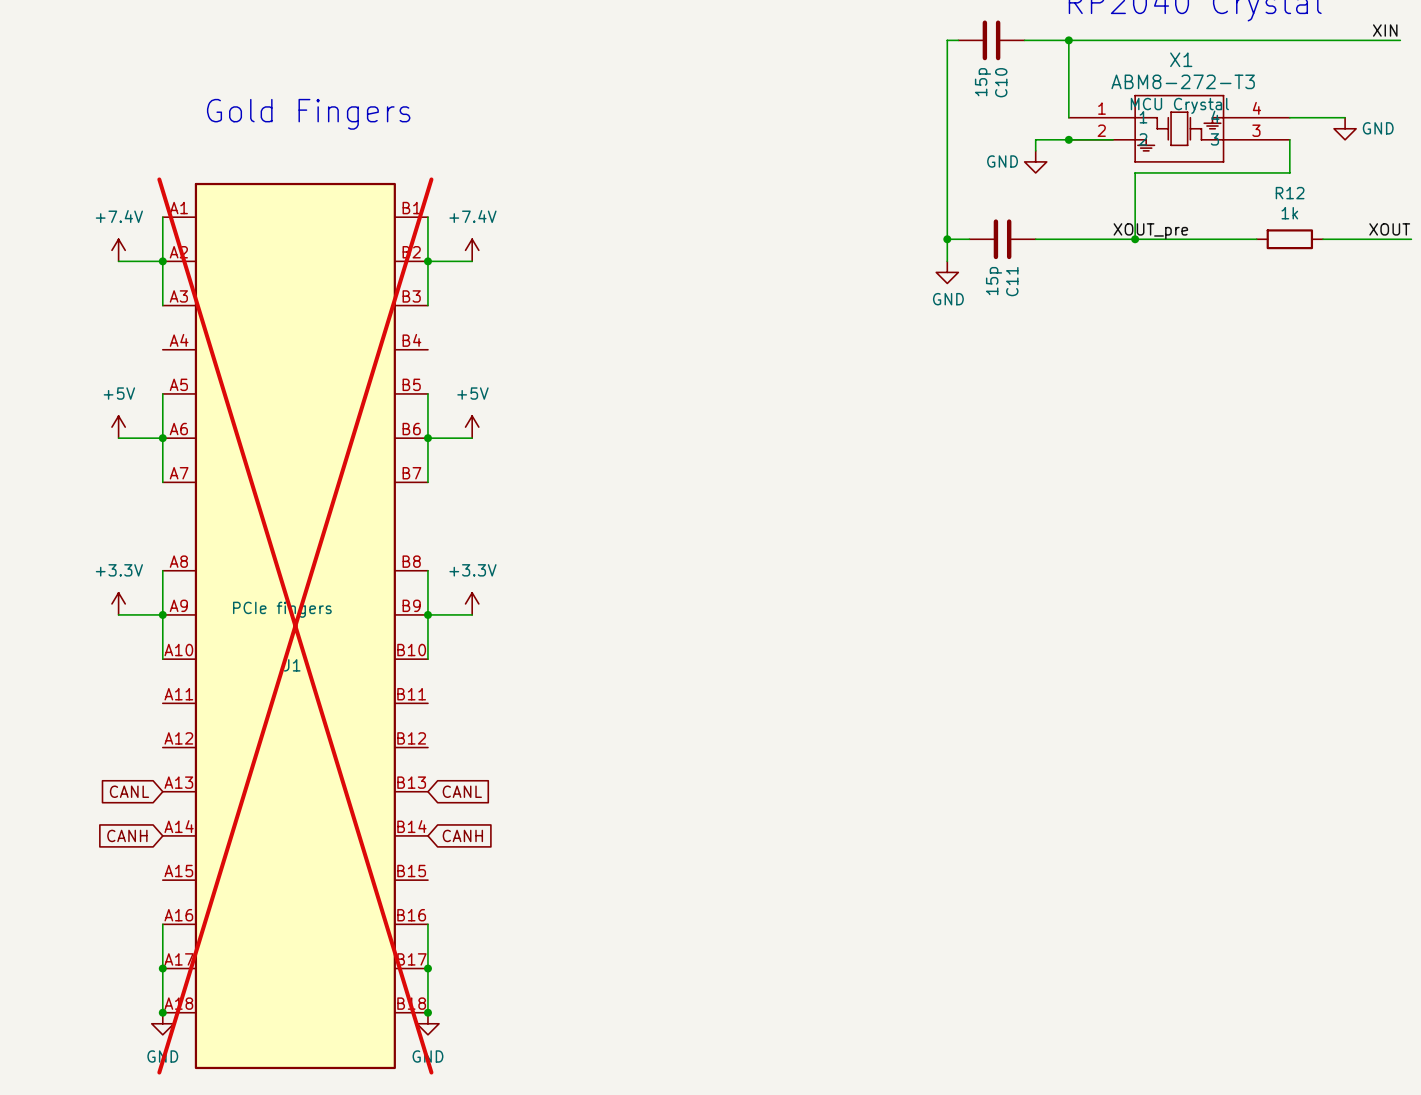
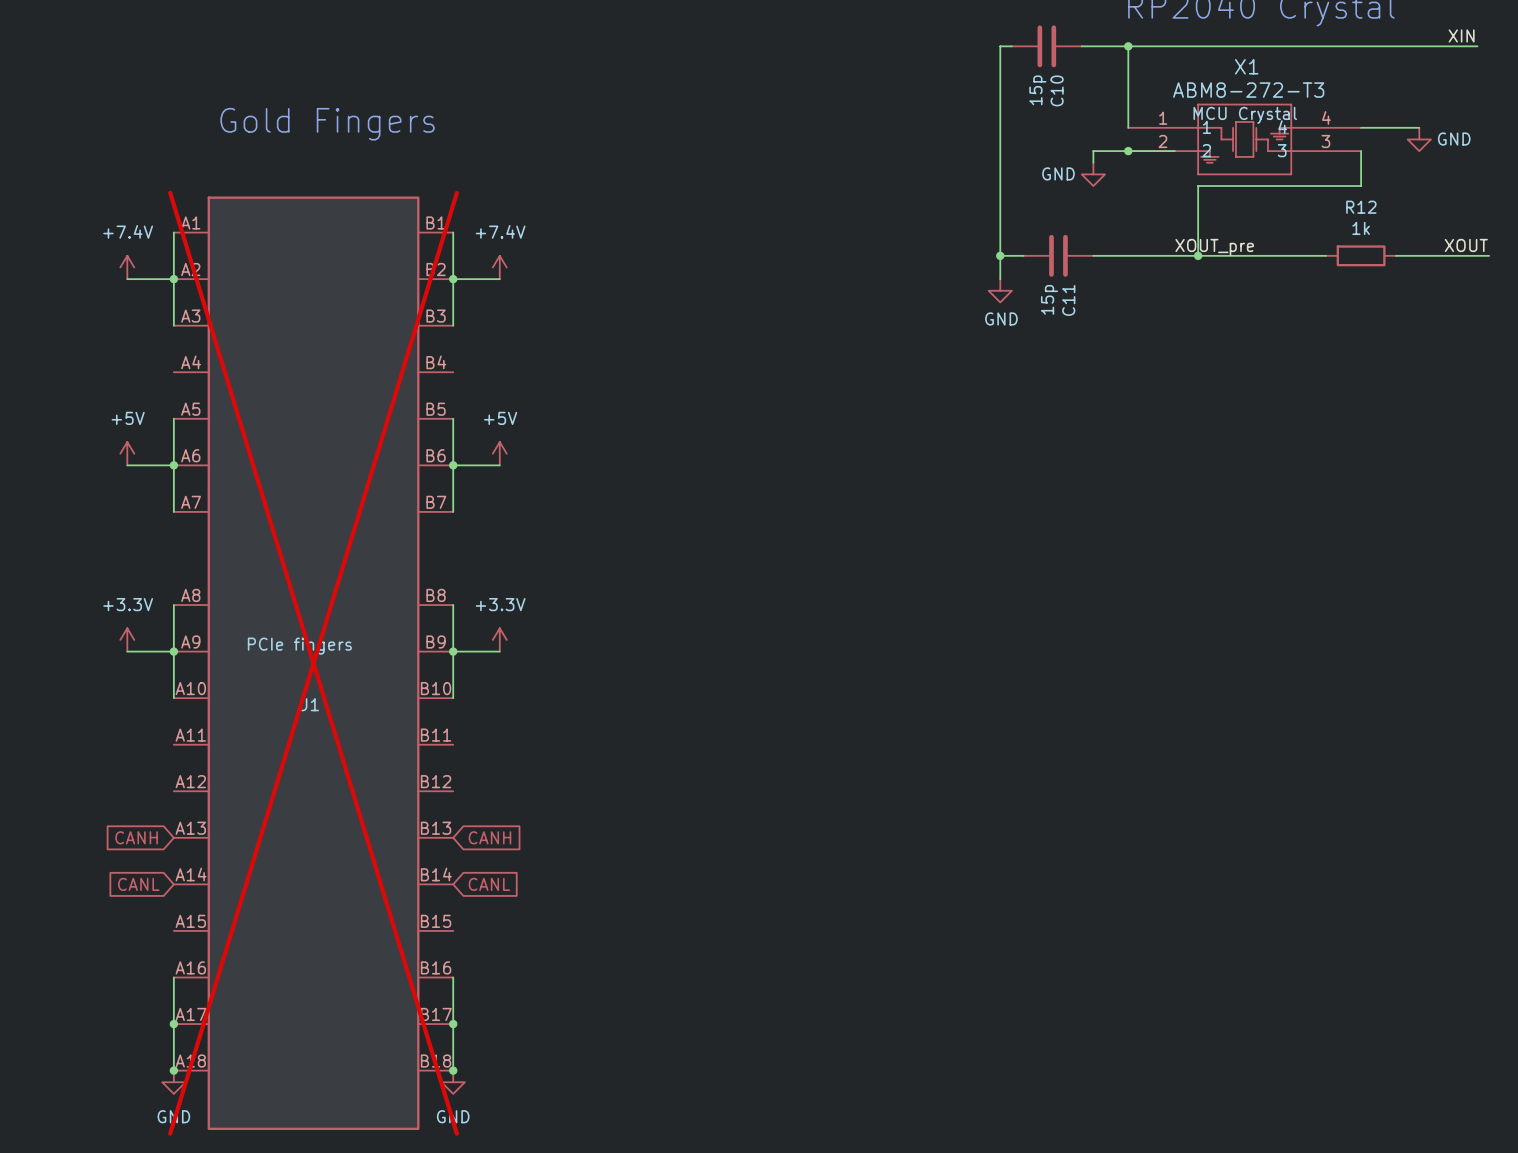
global label: CANL (129, 791) -> CANH (136, 837)
global label: CANL (462, 791) -> CANH (489, 837)
global label: CANH (127, 835) -> CANL (138, 884)
global label: CANH (462, 835) -> CANL (489, 884)

